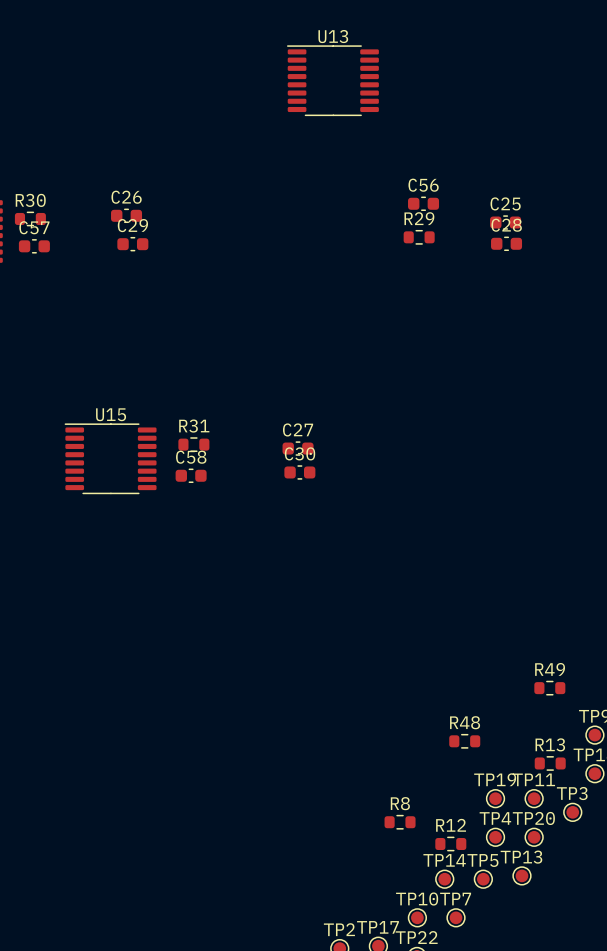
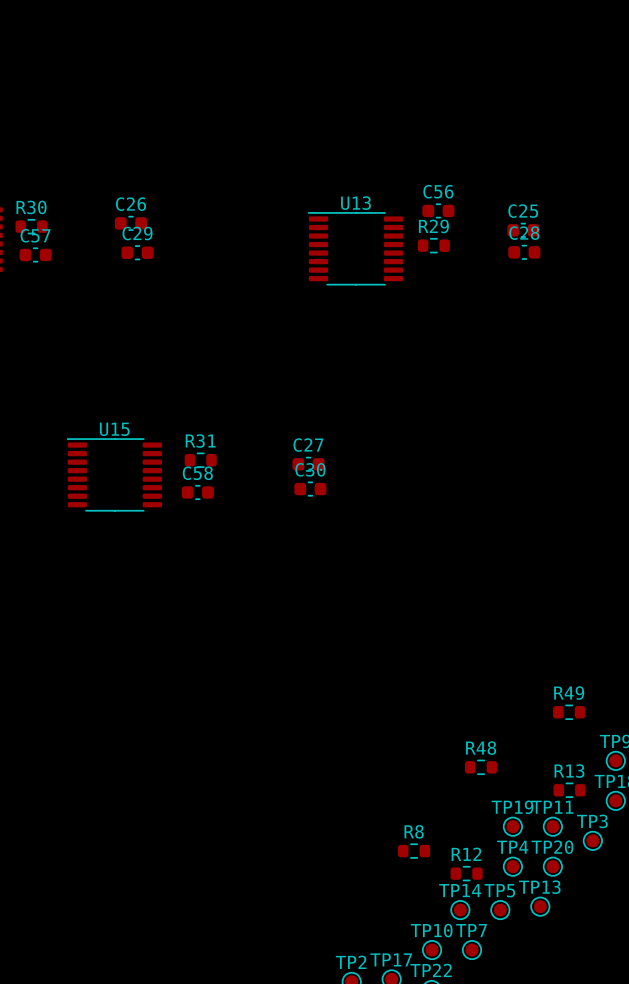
U13 position: (332, 80) -> (355, 248)

